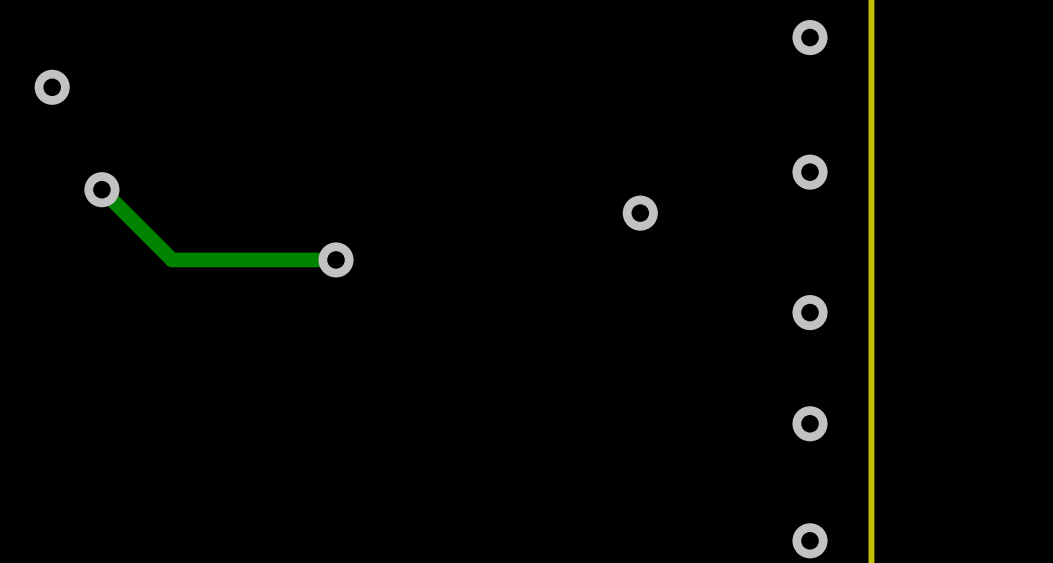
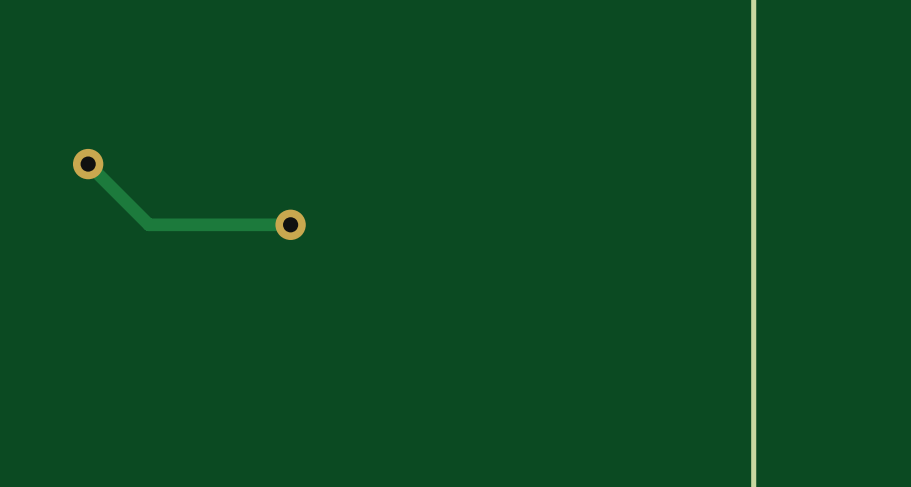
via: (810, 37) -> none
via: (52, 87) -> none
via: (810, 172) -> none
via: (640, 213) -> none
via: (810, 312) -> none
via: (810, 423) -> none
via: (810, 540) -> none

